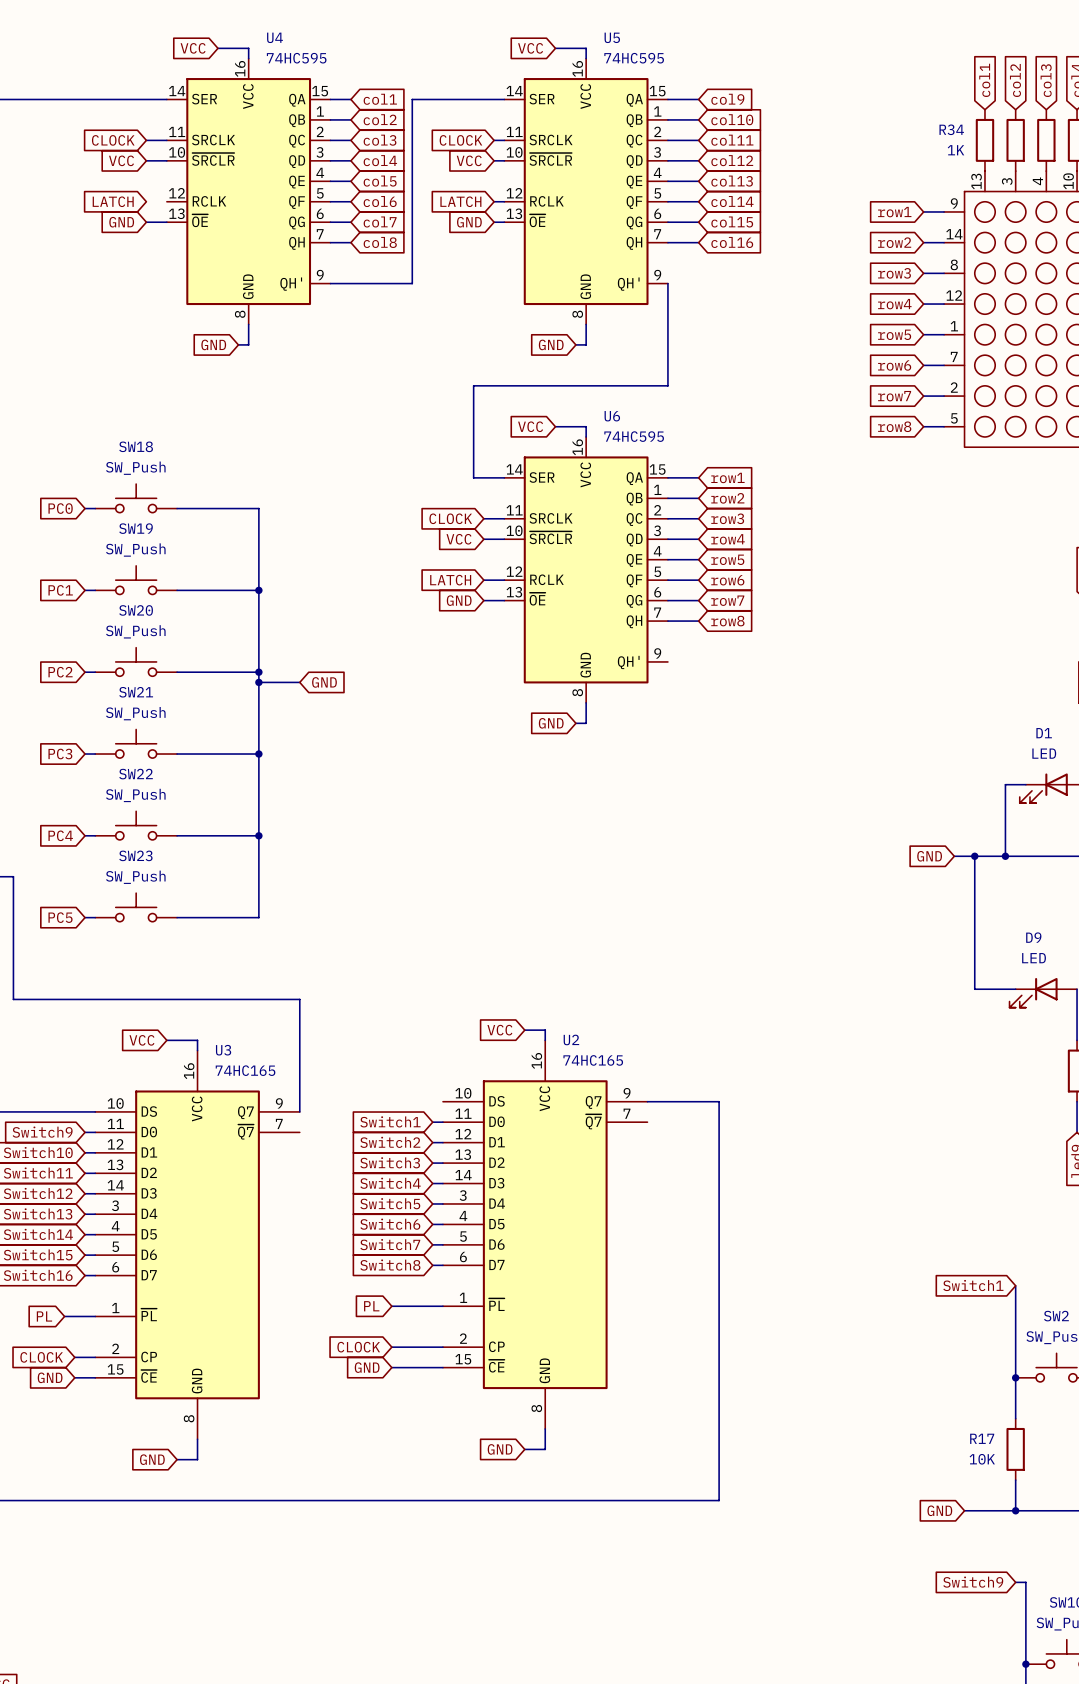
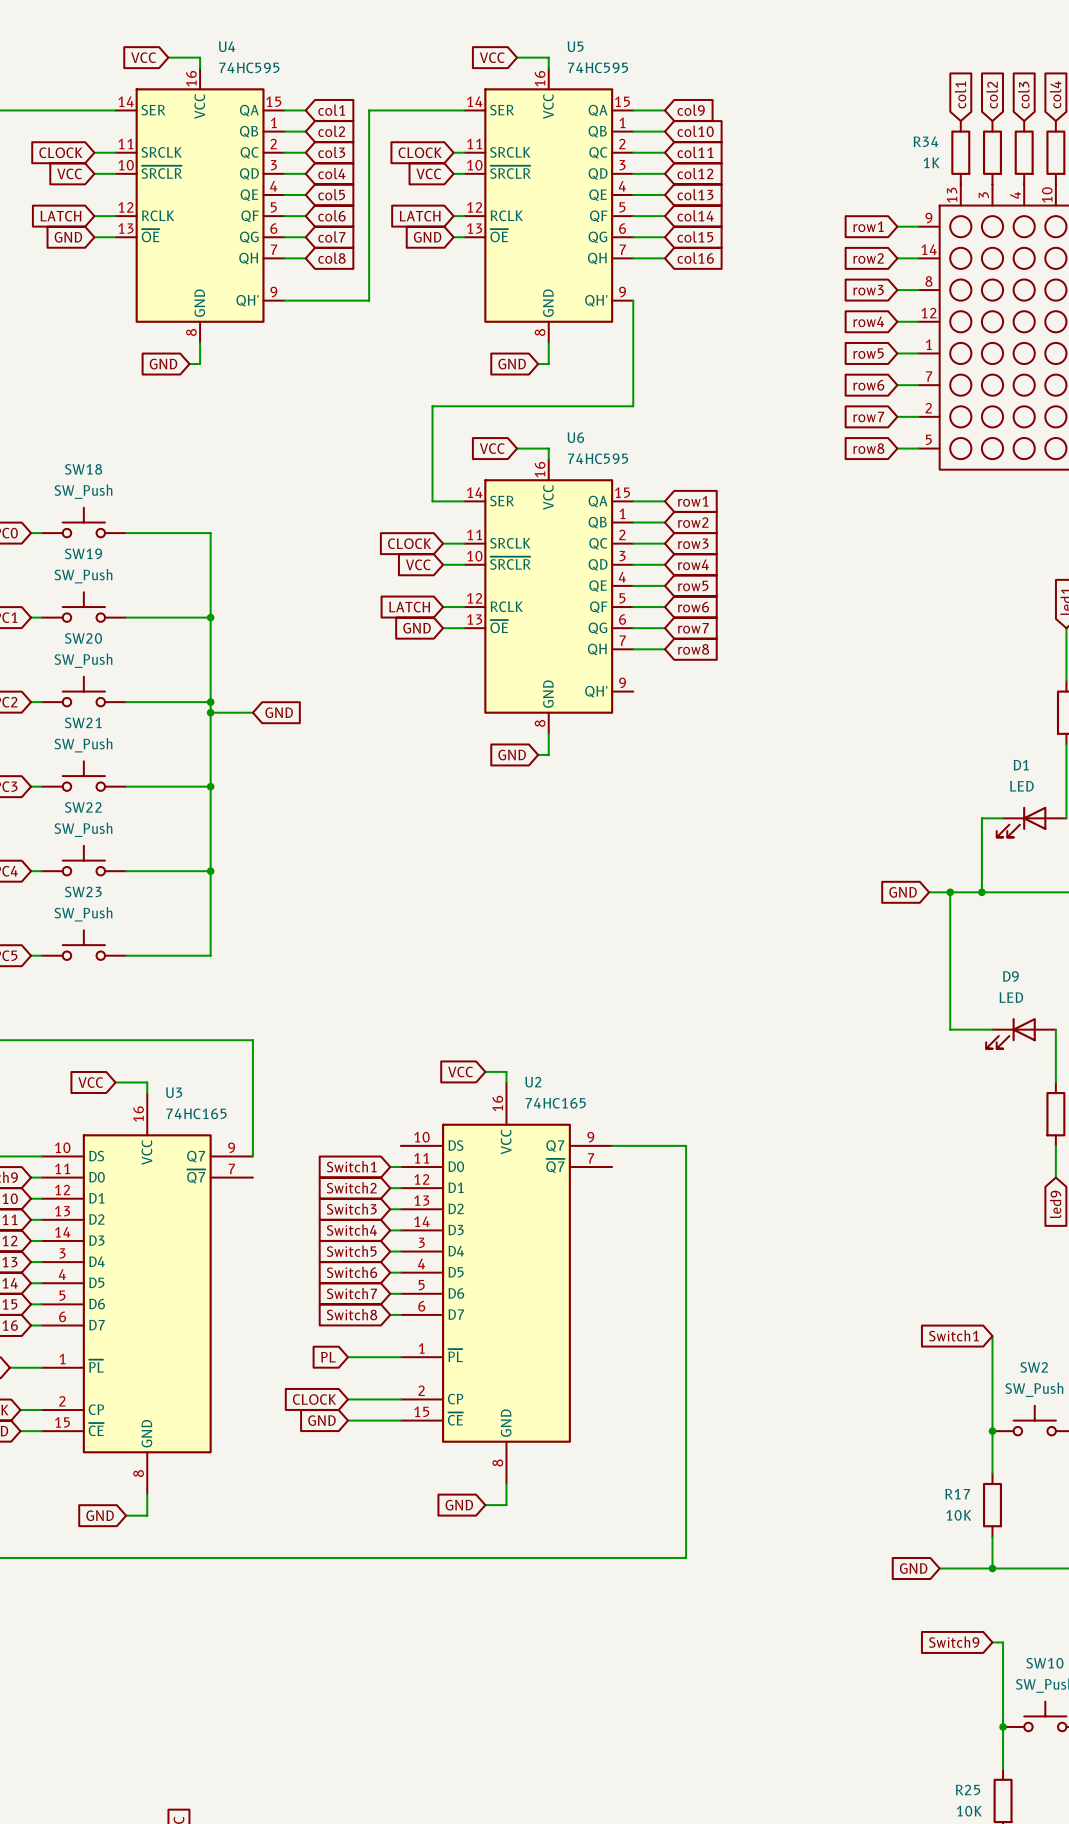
wire: none -> (94, 216) (115, 216)

